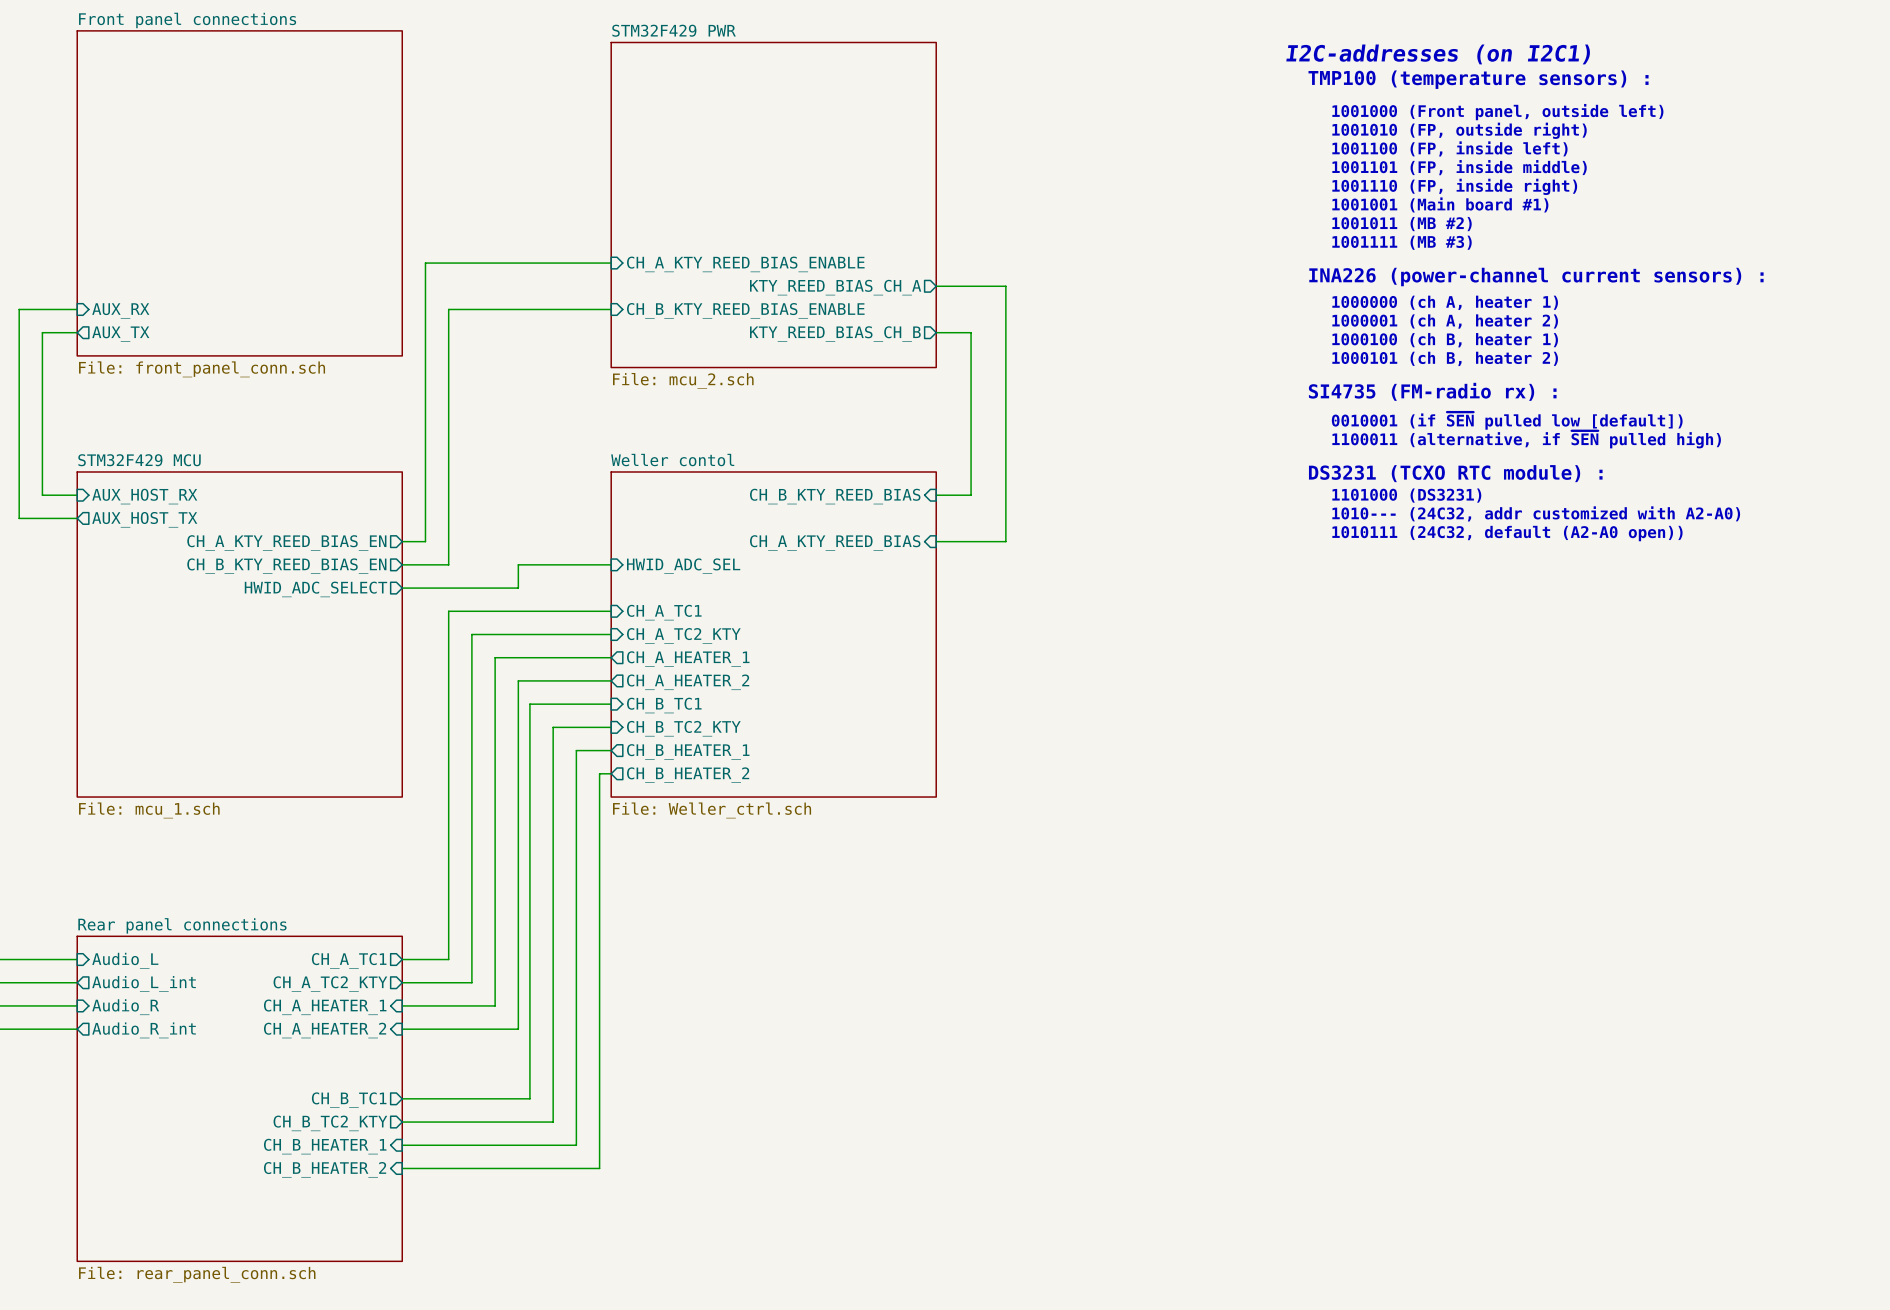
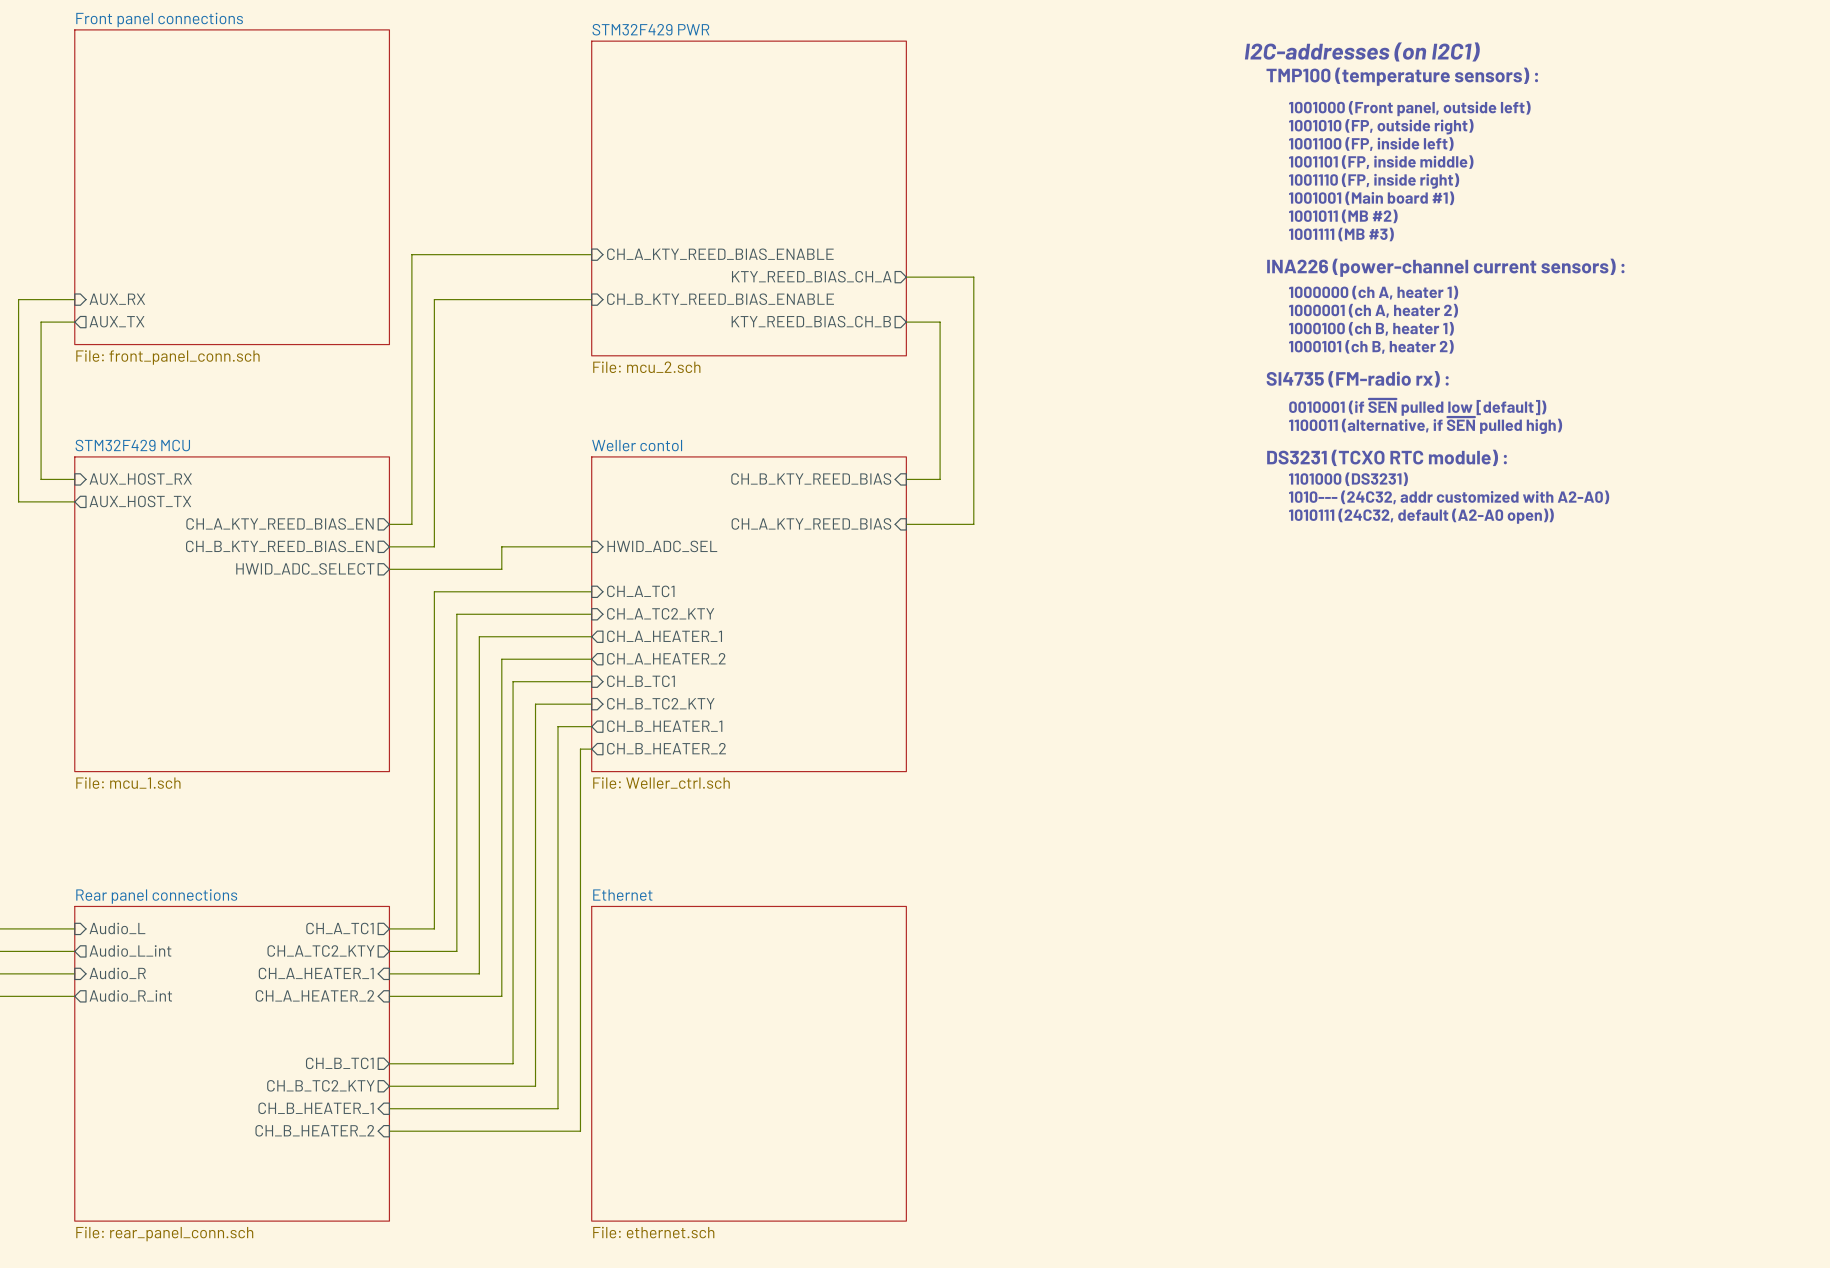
sheet Ethernet: none -> File: ethernet.sch (749, 1063)

